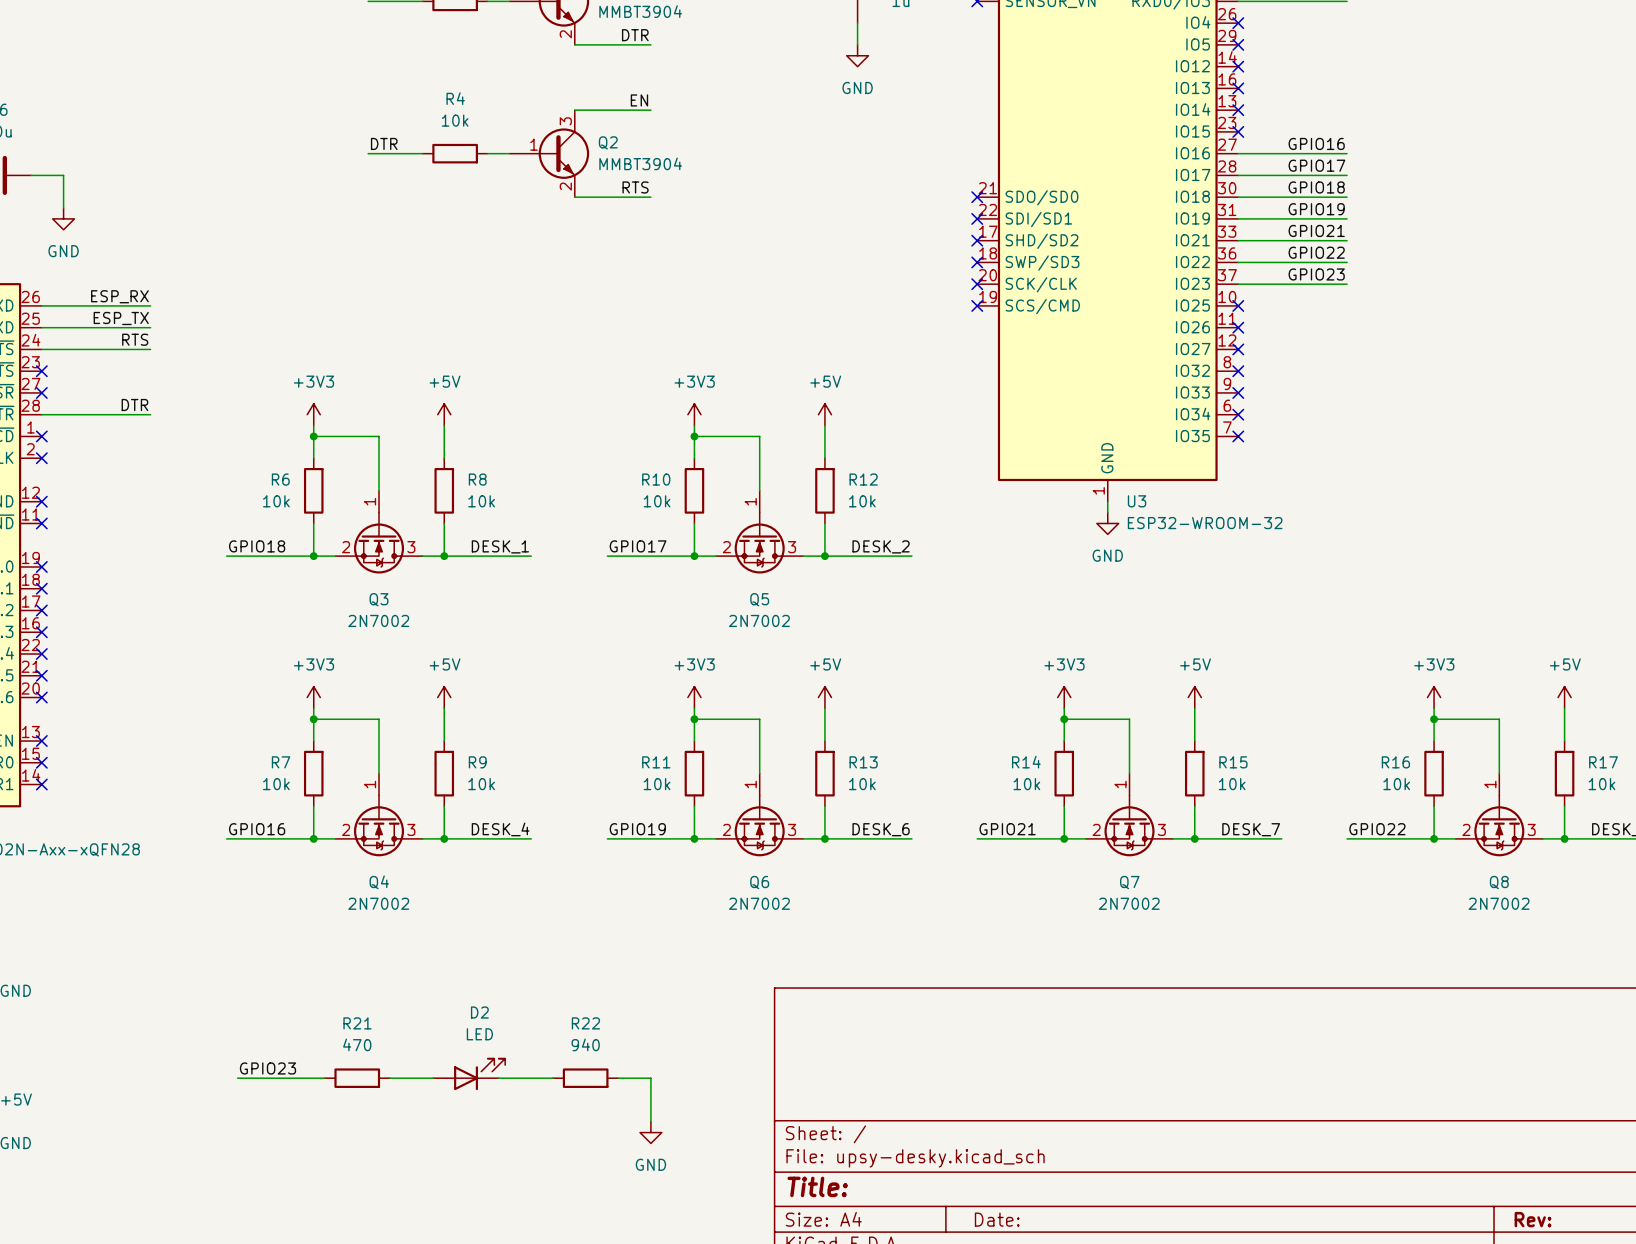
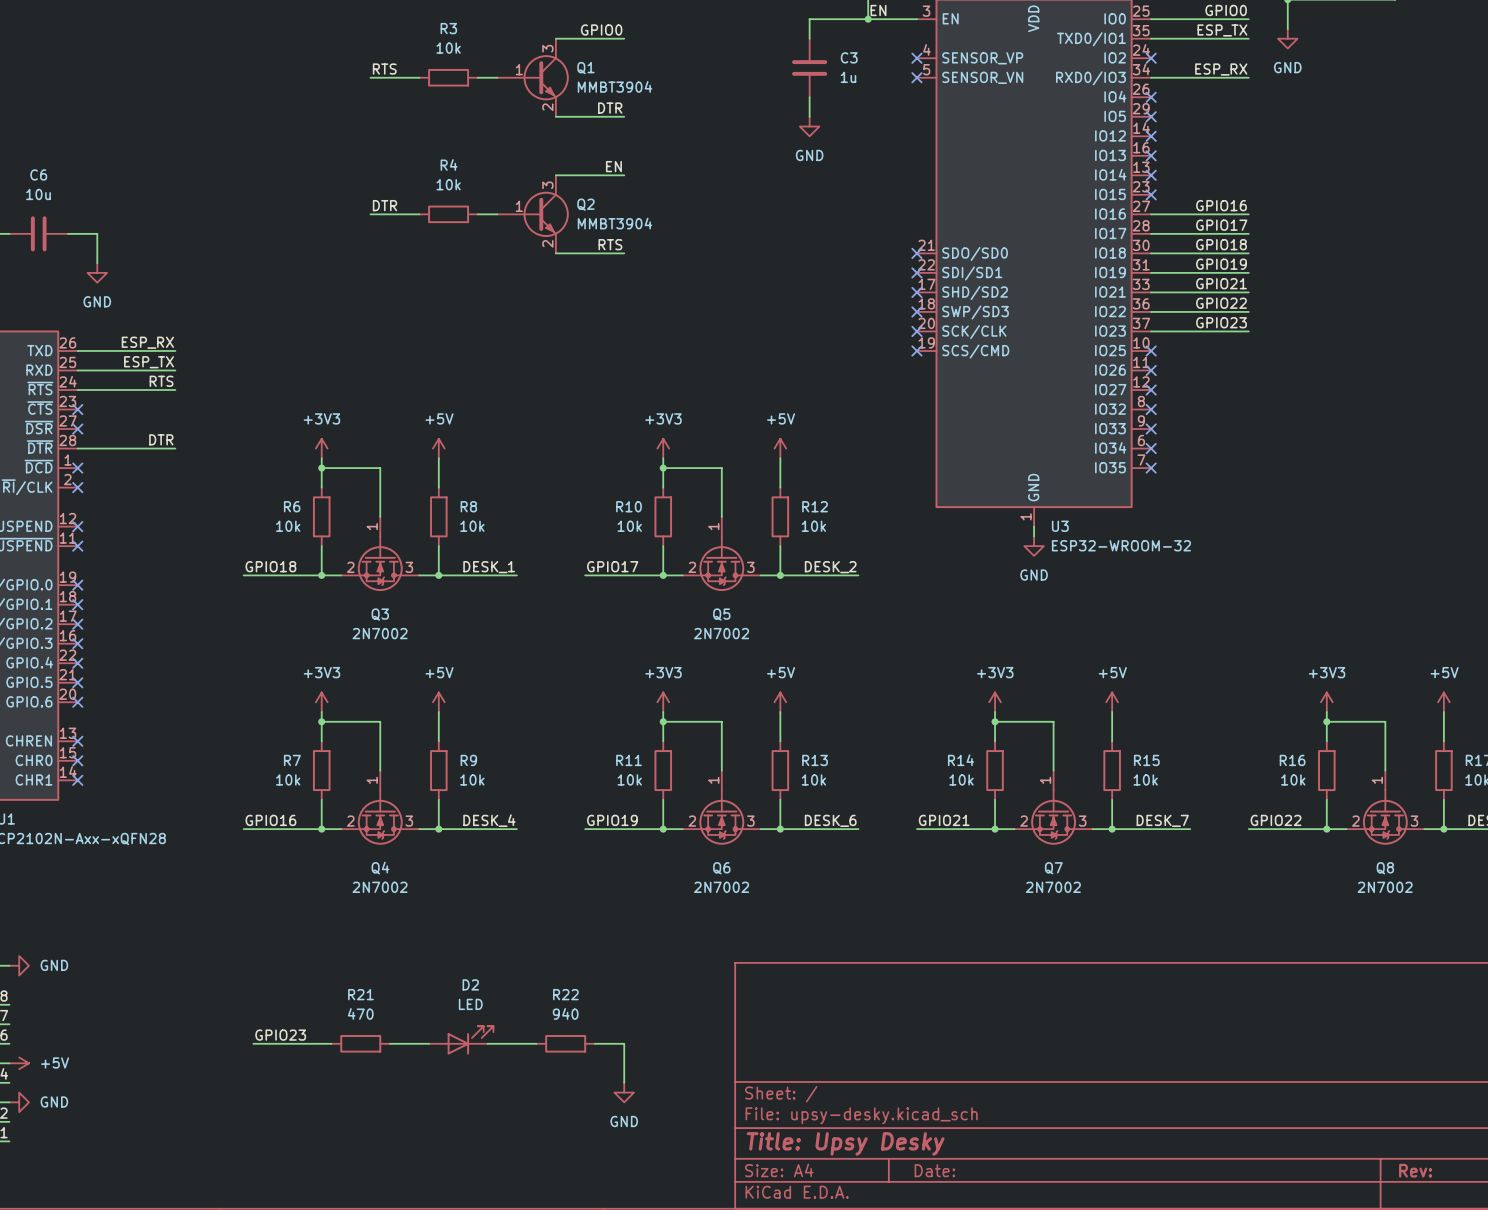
title block: Title: (817, 1186) -> Title: Upsy Desky (845, 1143)

